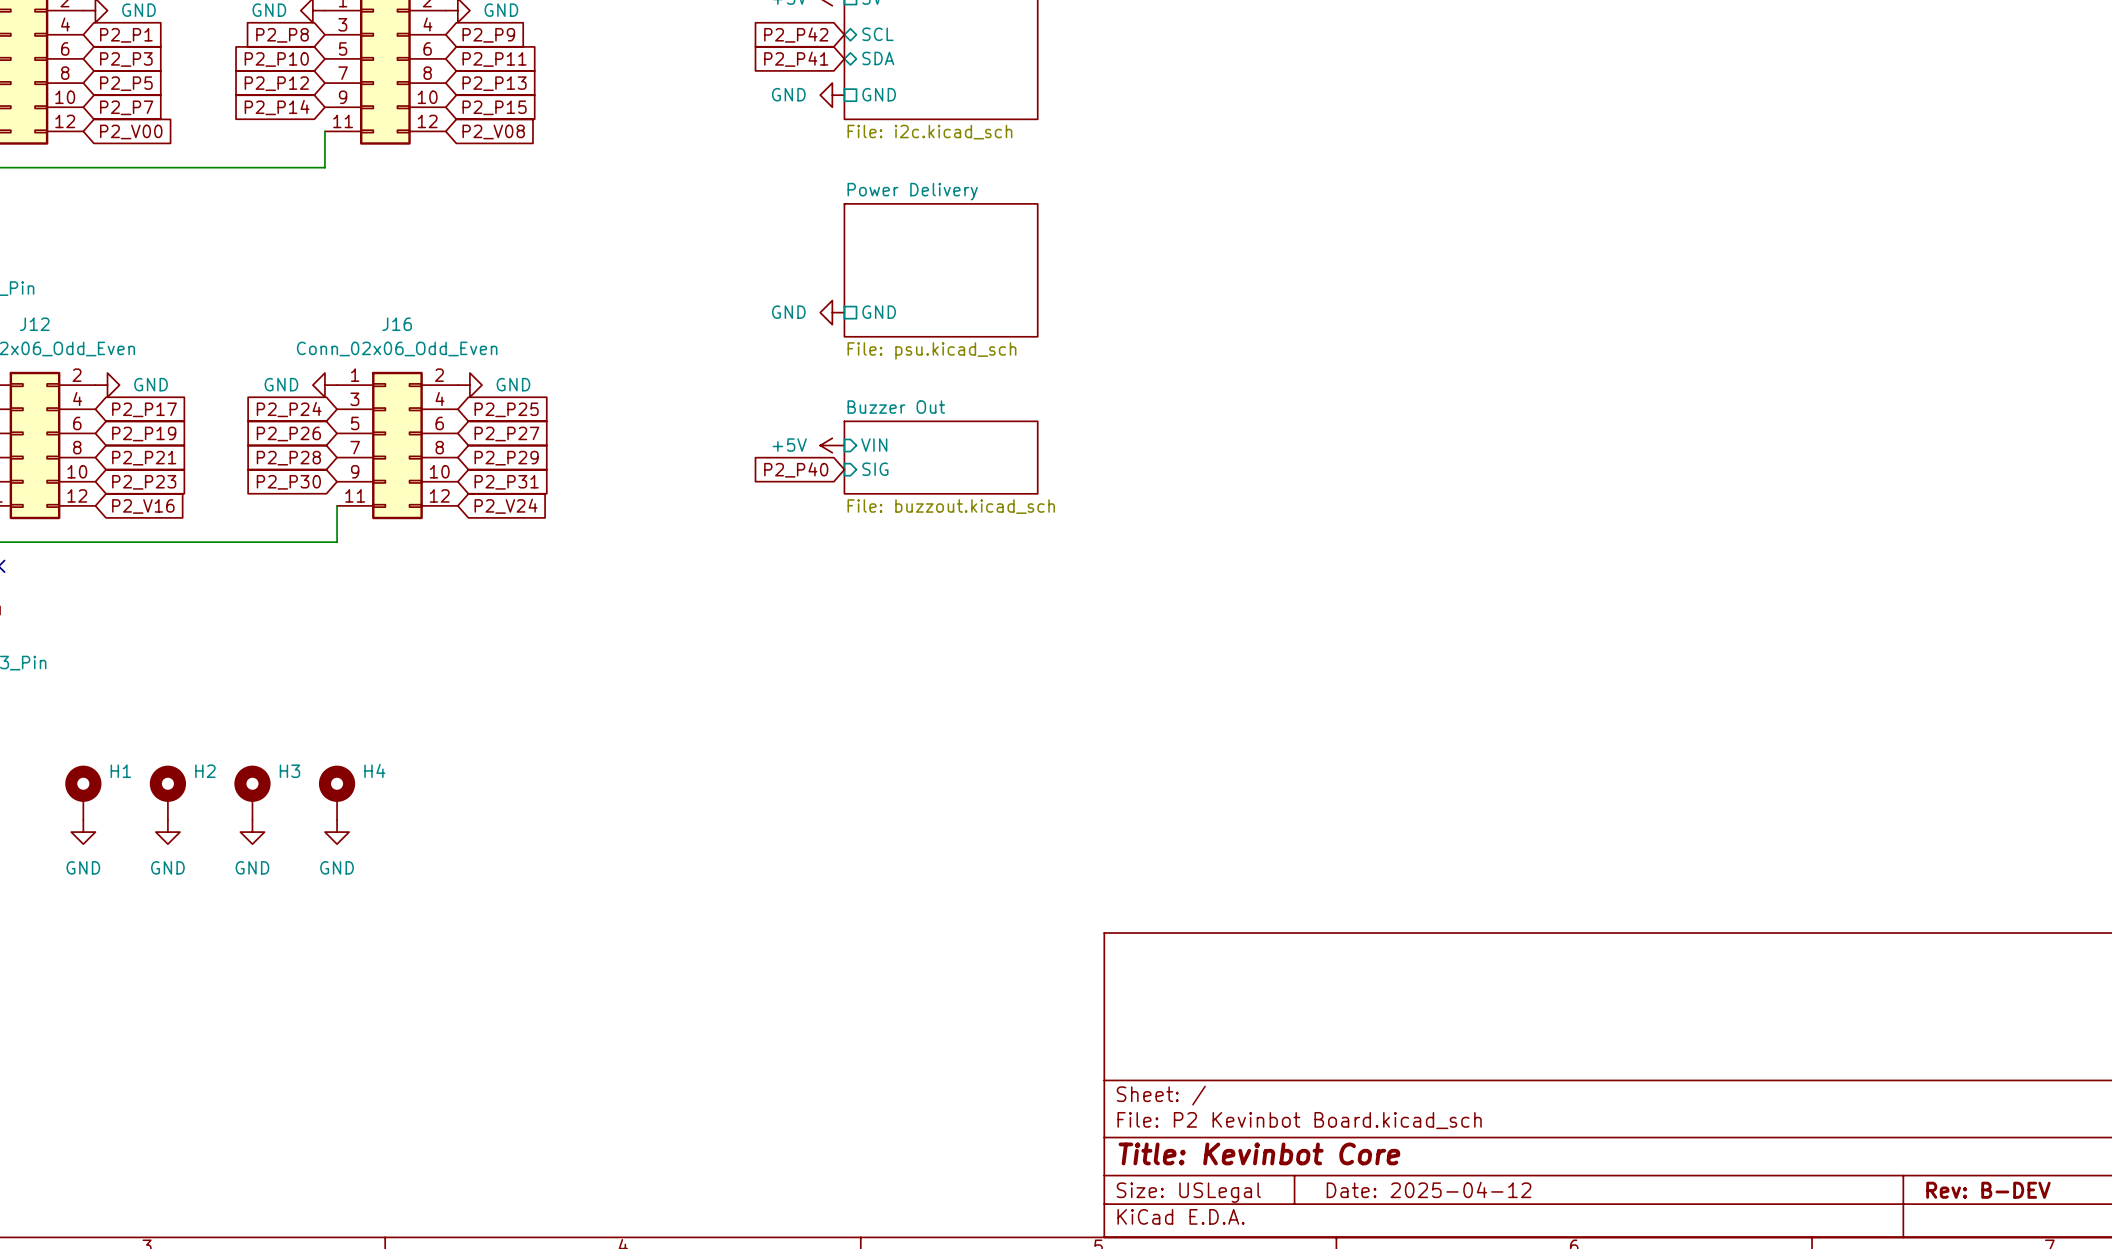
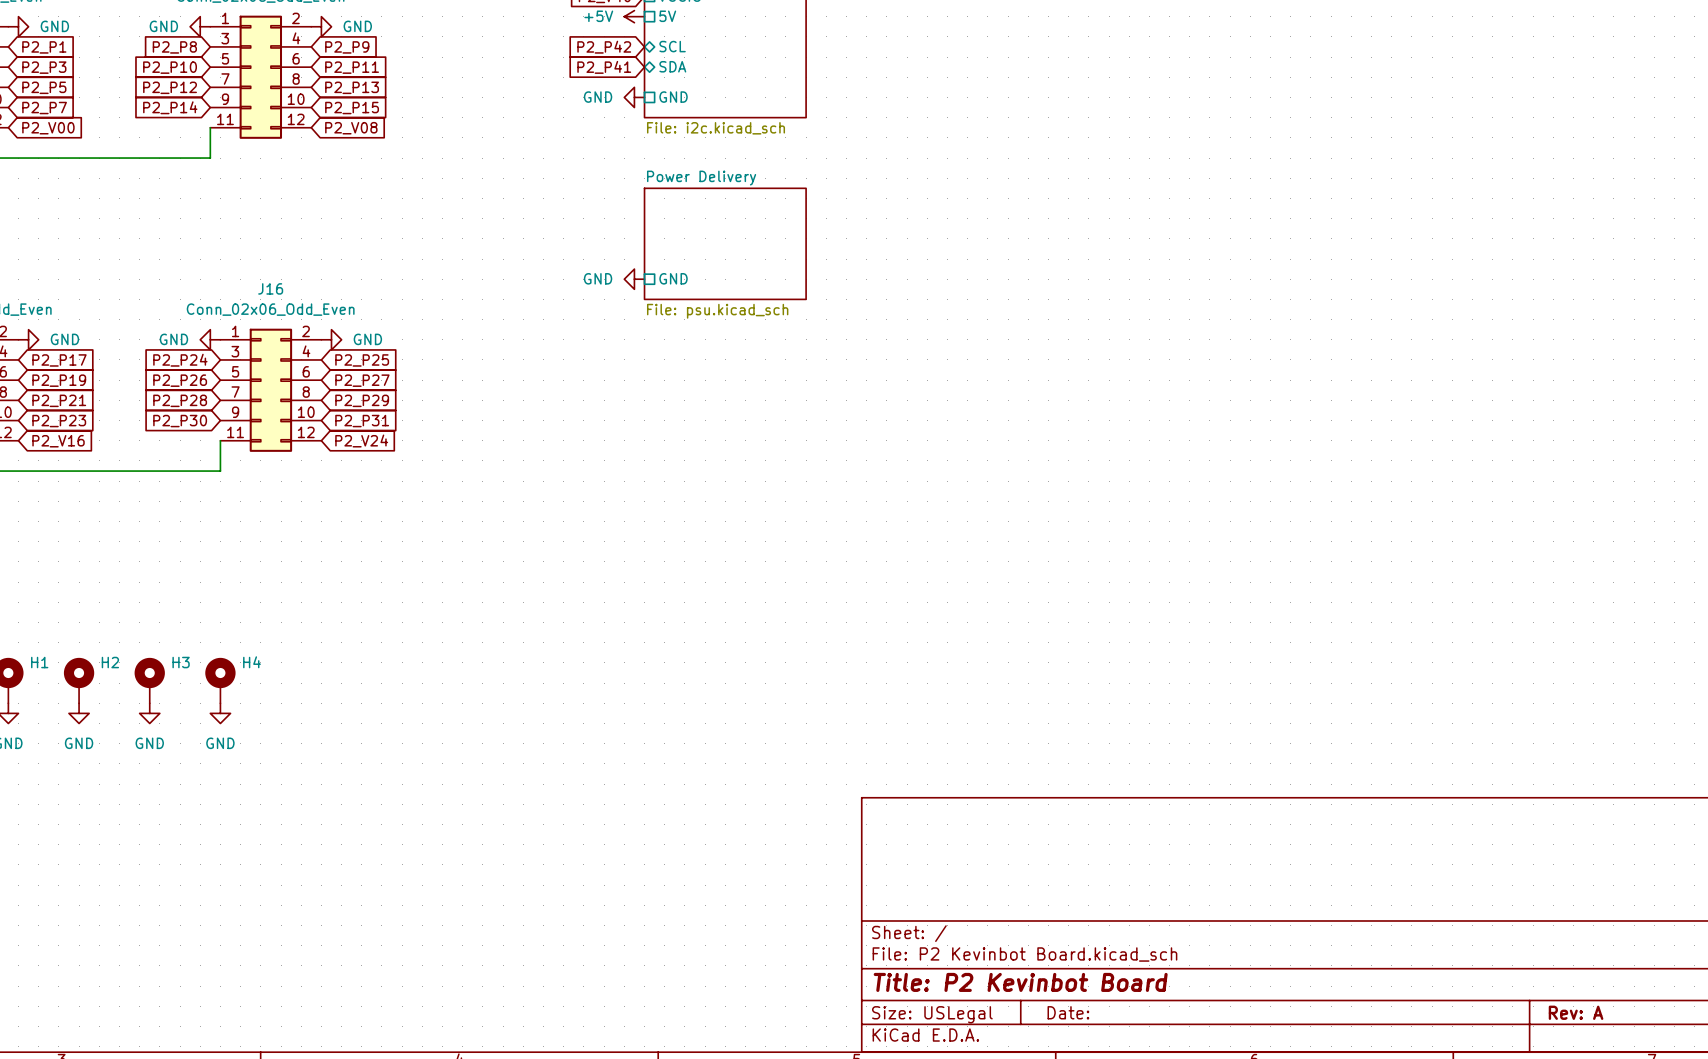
power symbol: +5V (832, 445) -> none
sheet pin: VIN (874, 445) -> none
sheet Buzzer Out: File: buzzout.kicad_sch (941, 457) -> none
global label: P2_P40 (796, 469) -> none
sheet pin: SIG (875, 469) -> none
title block: Title: Kevinbot Core (1259, 1153) -> Title: P2 Kevinbot Board (1020, 982)
title block: Date: 2025-04-12 (1429, 1189) -> Date: (1068, 1012)
title block: Rev: B-DEV (1988, 1190) -> Rev: A (1576, 1012)

